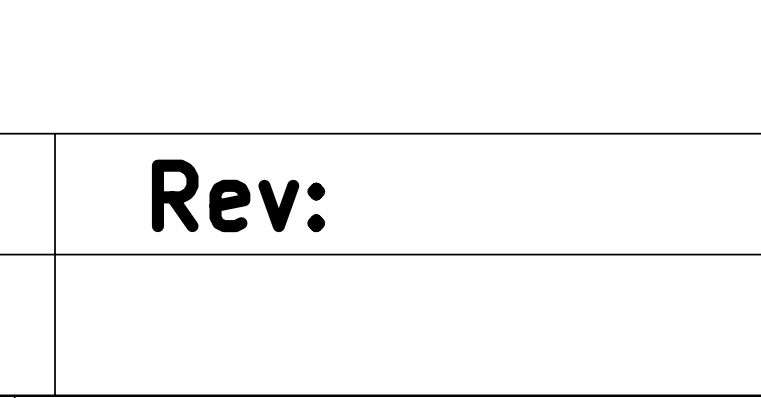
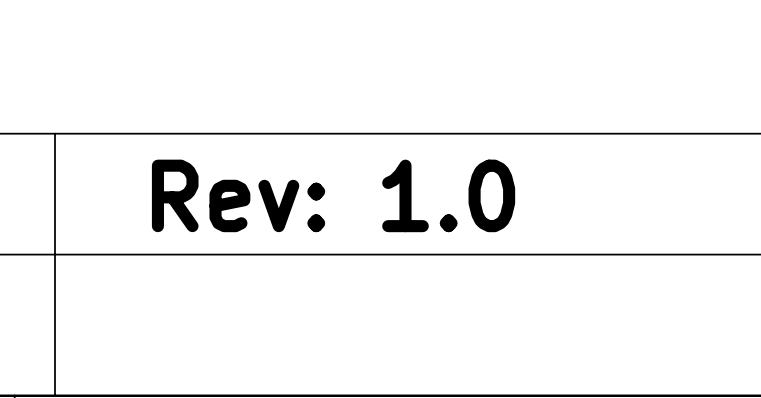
title block: Rev: (238, 195) -> Rev: 1.0 (333, 195)

